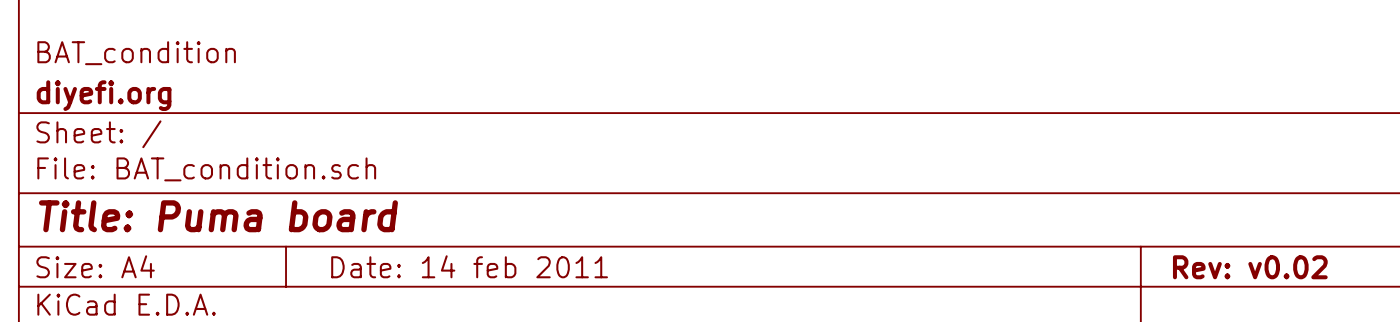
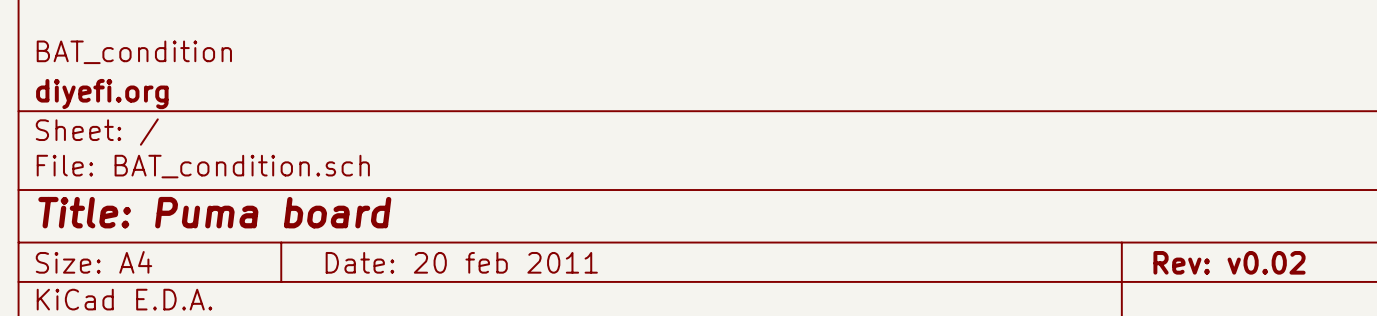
title block: Date: 14 feb 2011 (469, 266) -> Date: 20 feb 2011 (461, 262)

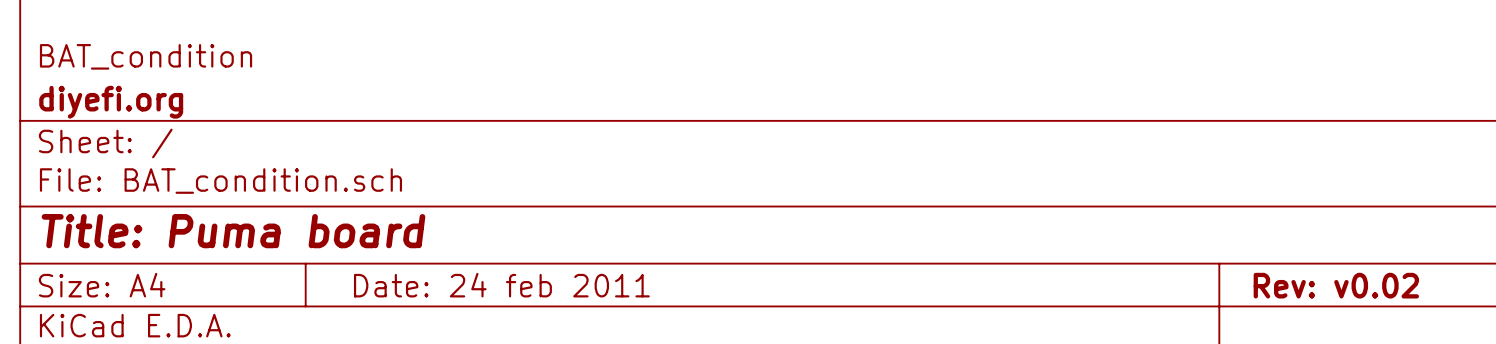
title block: Date: 20 feb 2011 (461, 262) -> Date: 24 feb 2011 (501, 285)

